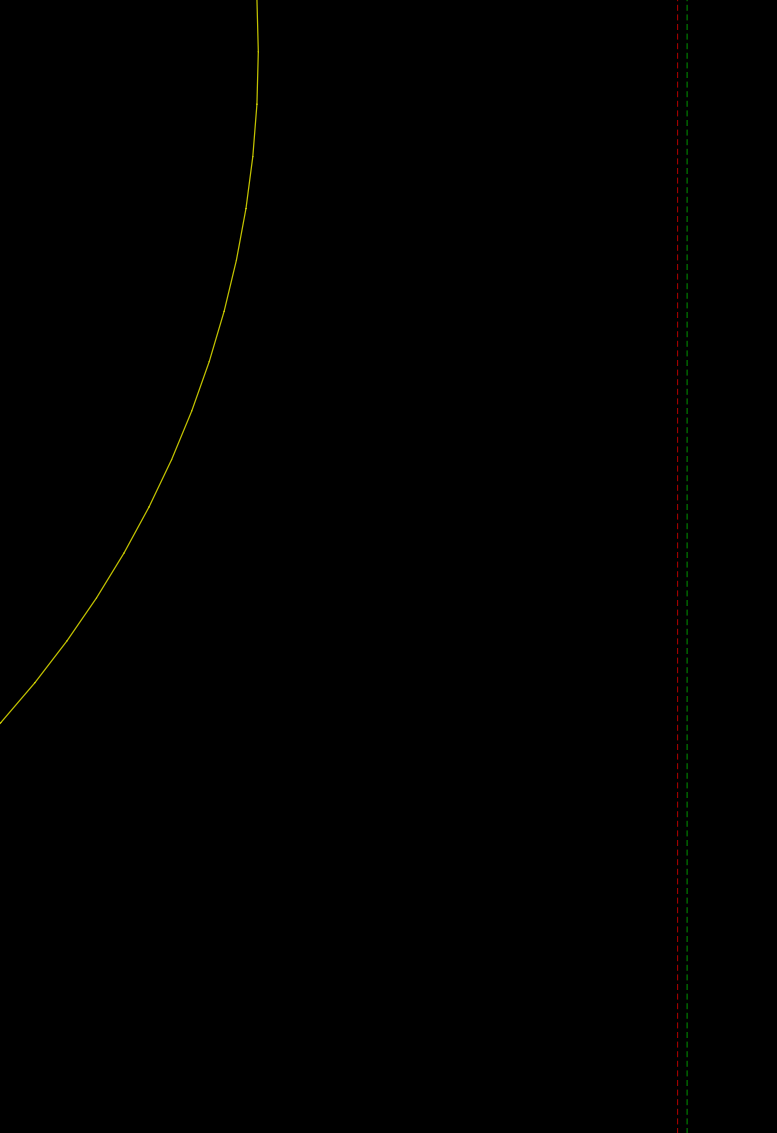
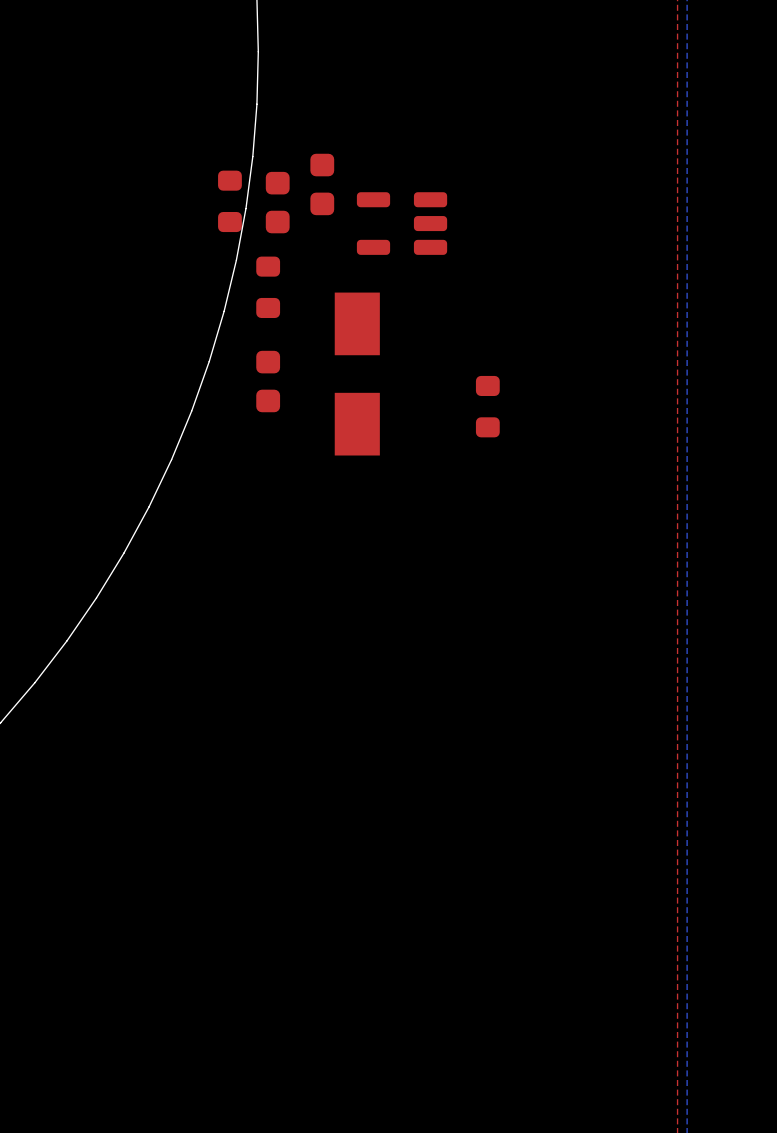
part: none -> (322, 184)
part: none -> (229, 201)
part: none -> (277, 202)
part: none -> (402, 223)
part: none -> (268, 287)
part: none -> (357, 374)
part: none -> (268, 381)
part: none -> (487, 406)

